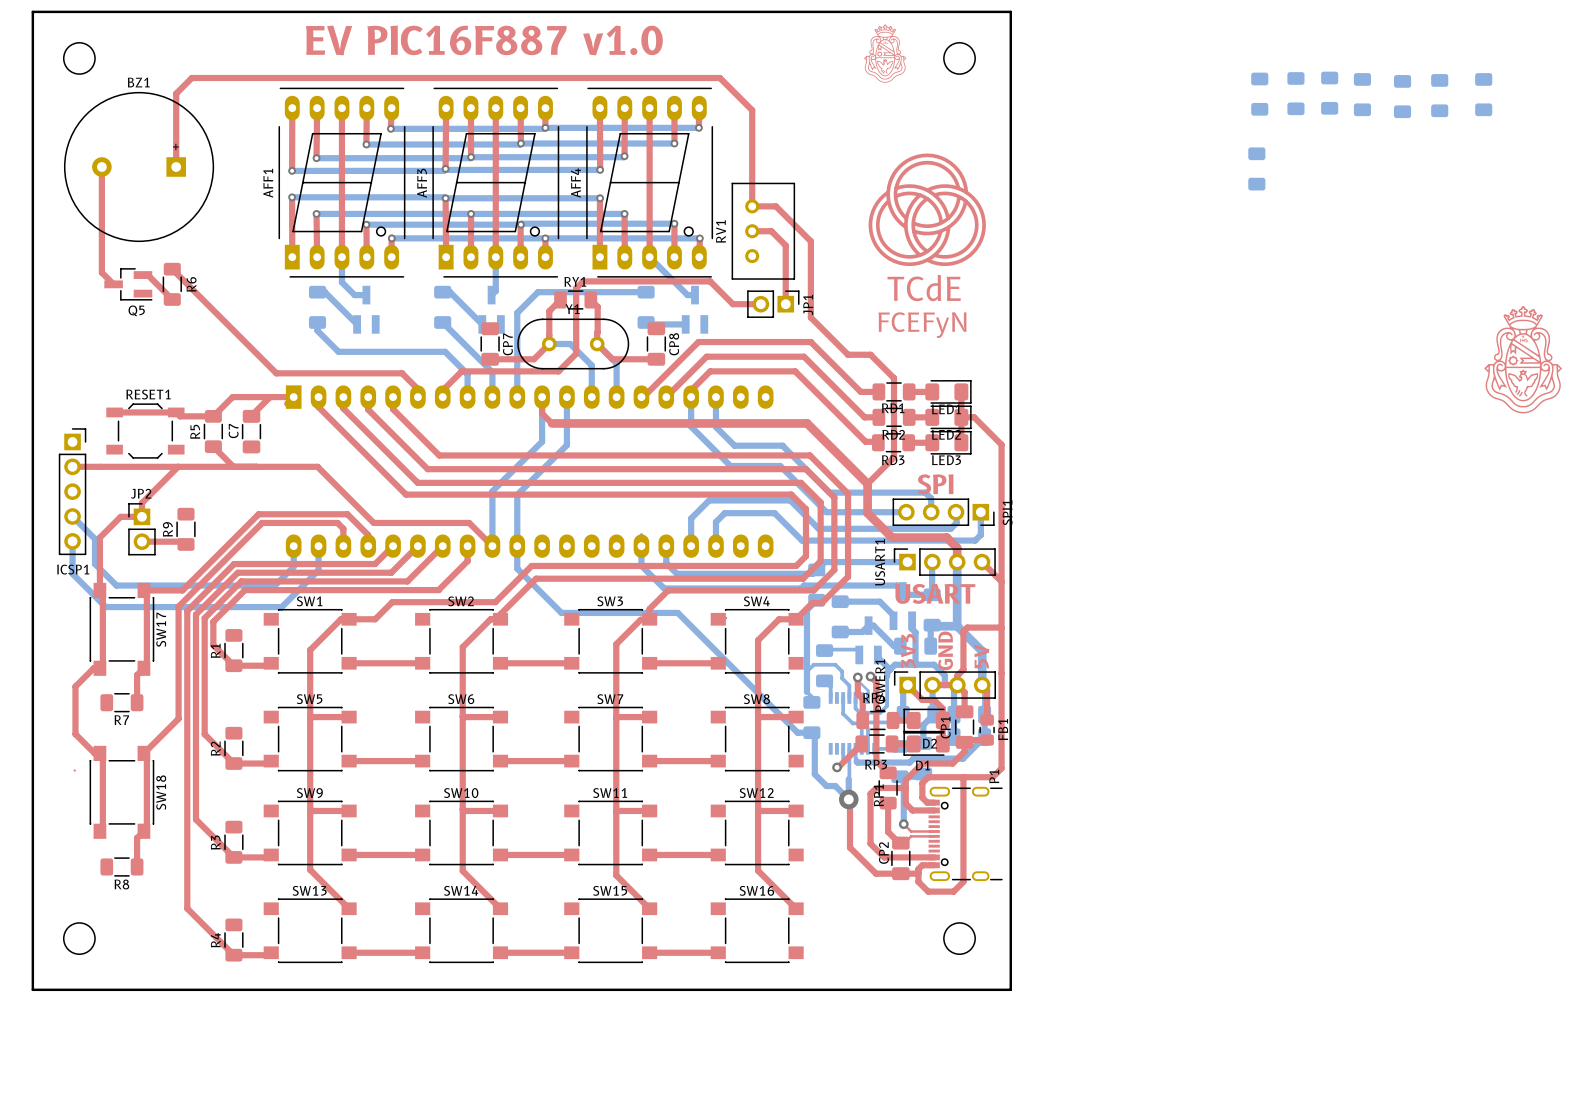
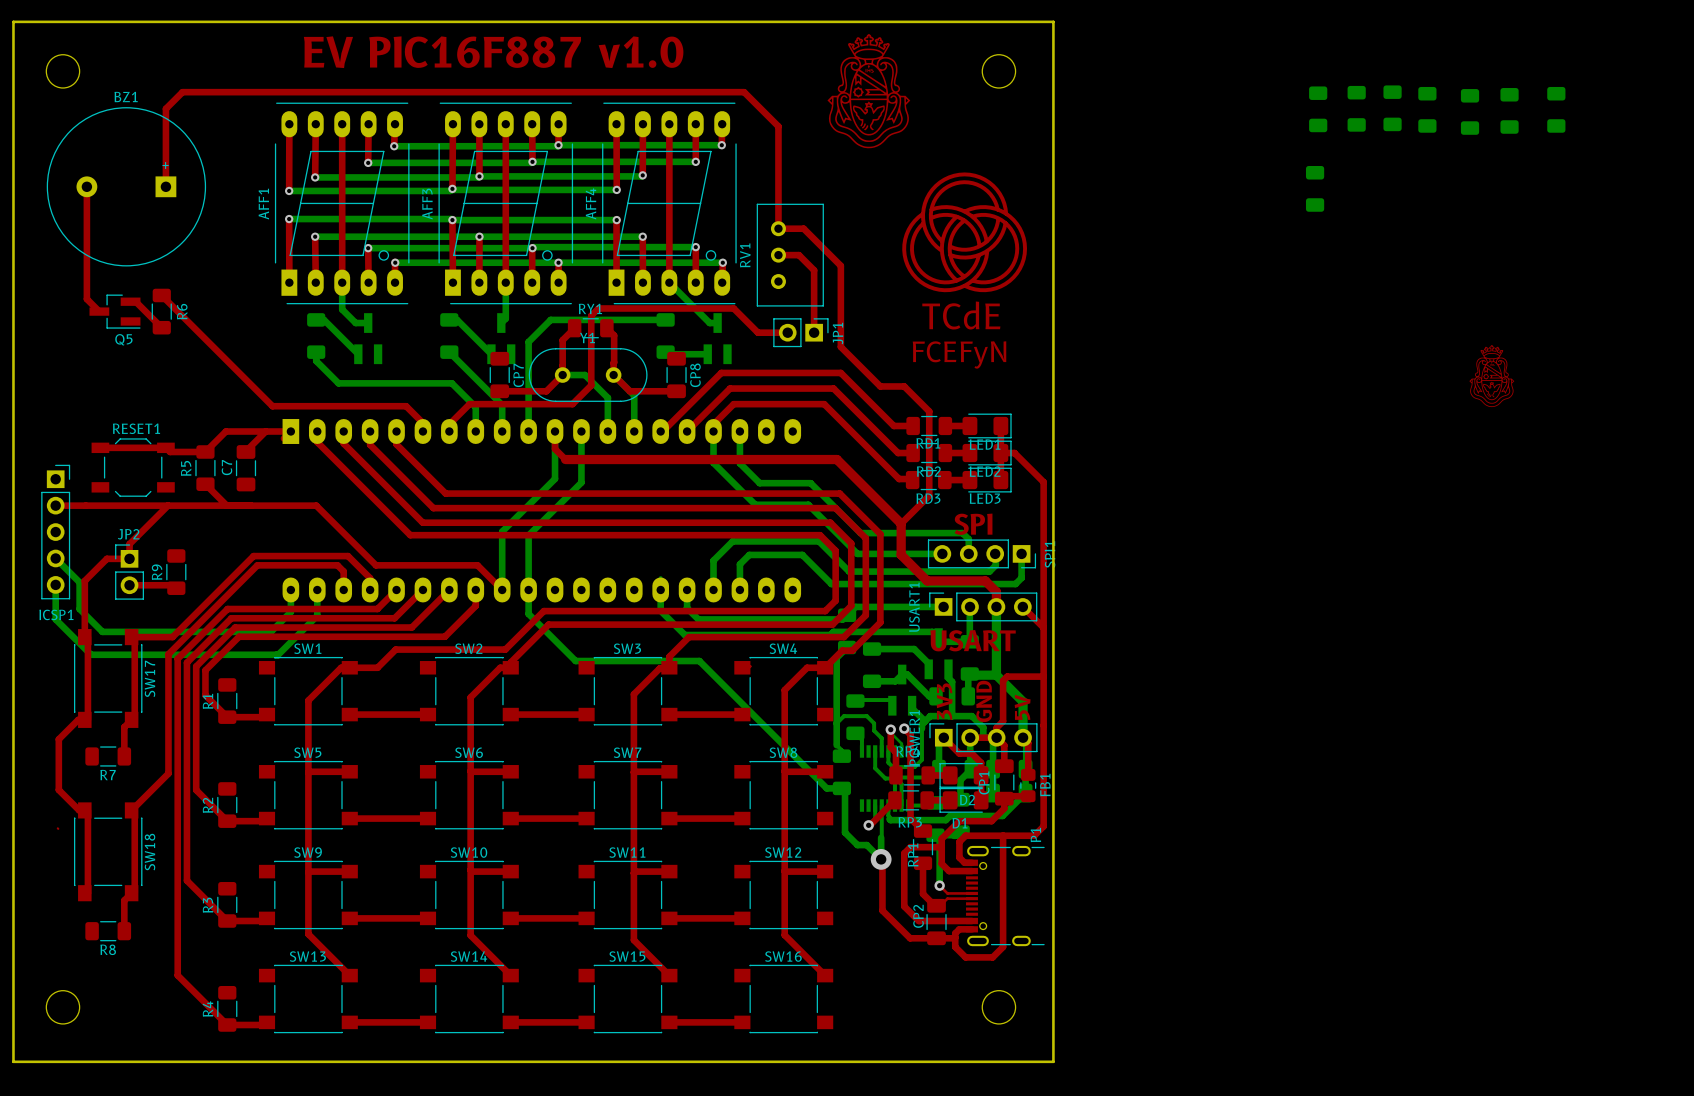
drawing: none -> [827, 33, 911, 149]
drawing: [864, 24, 907, 83] -> none
drawing: [1484, 305, 1563, 414] -> none
drawing: none -> [1469, 345, 1515, 408]

